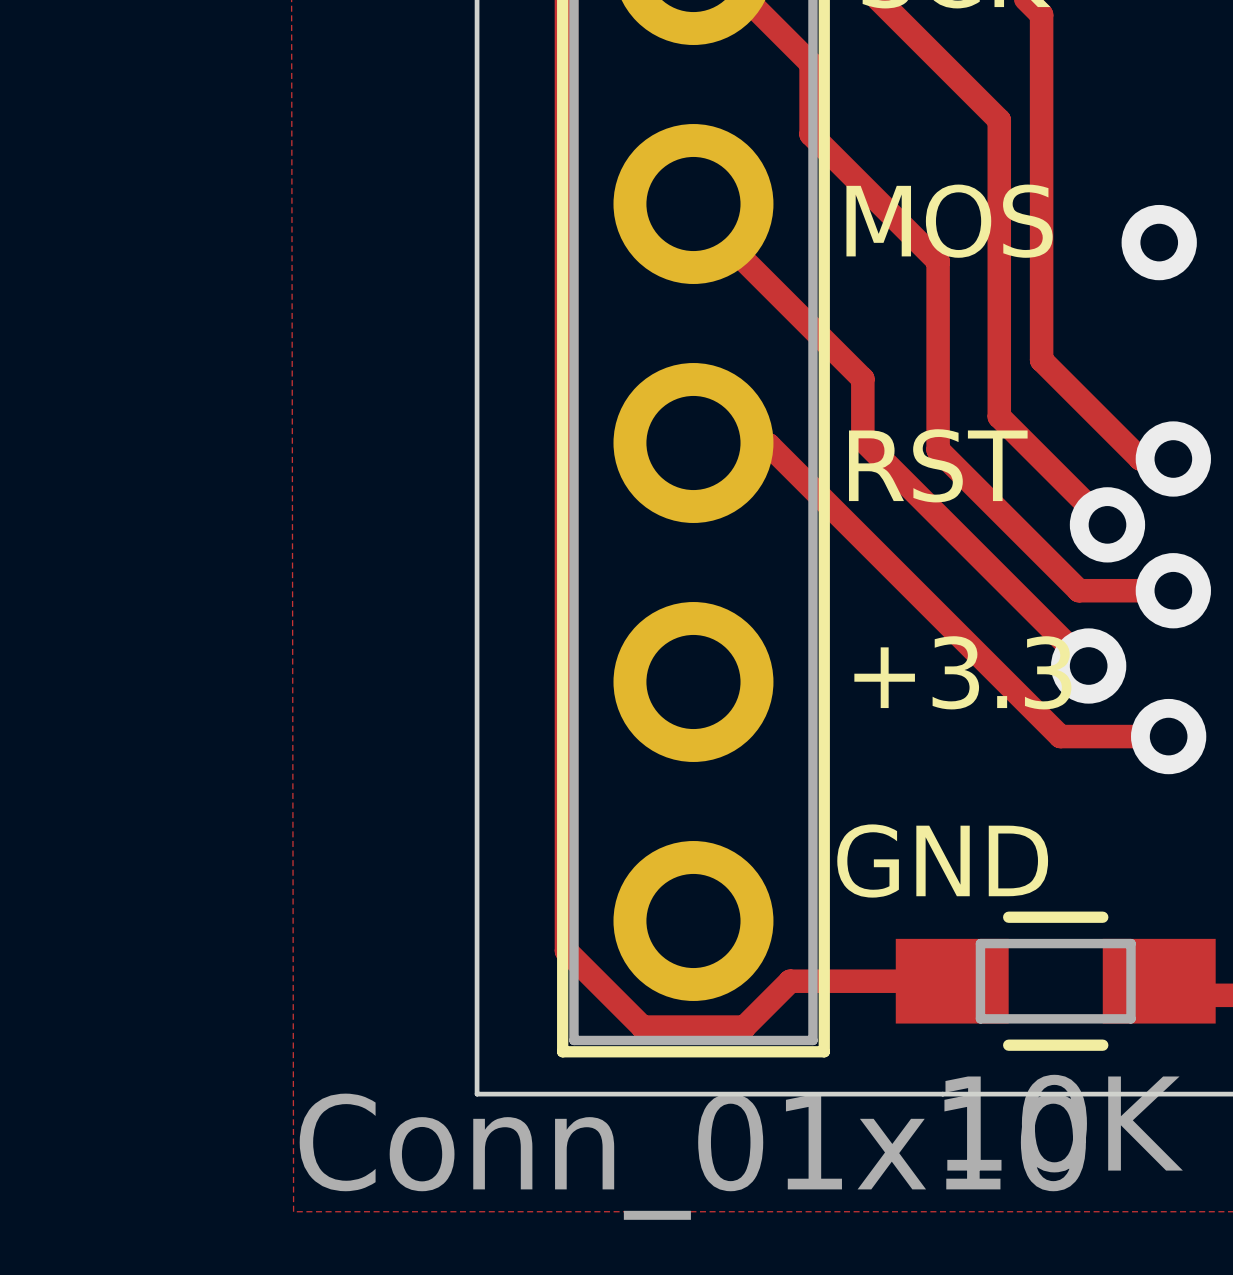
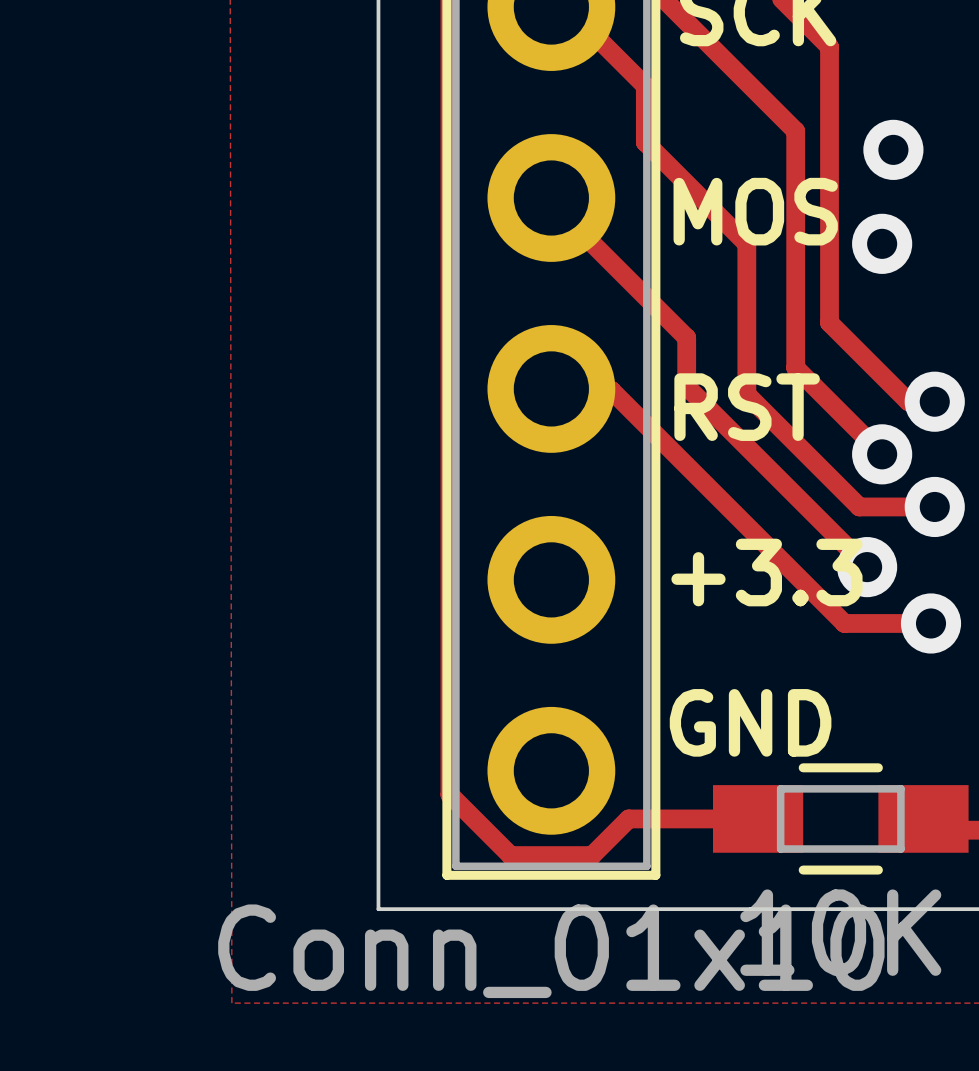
via: none -> (893, 149)
via position: (1159, 242) -> (882, 243)

